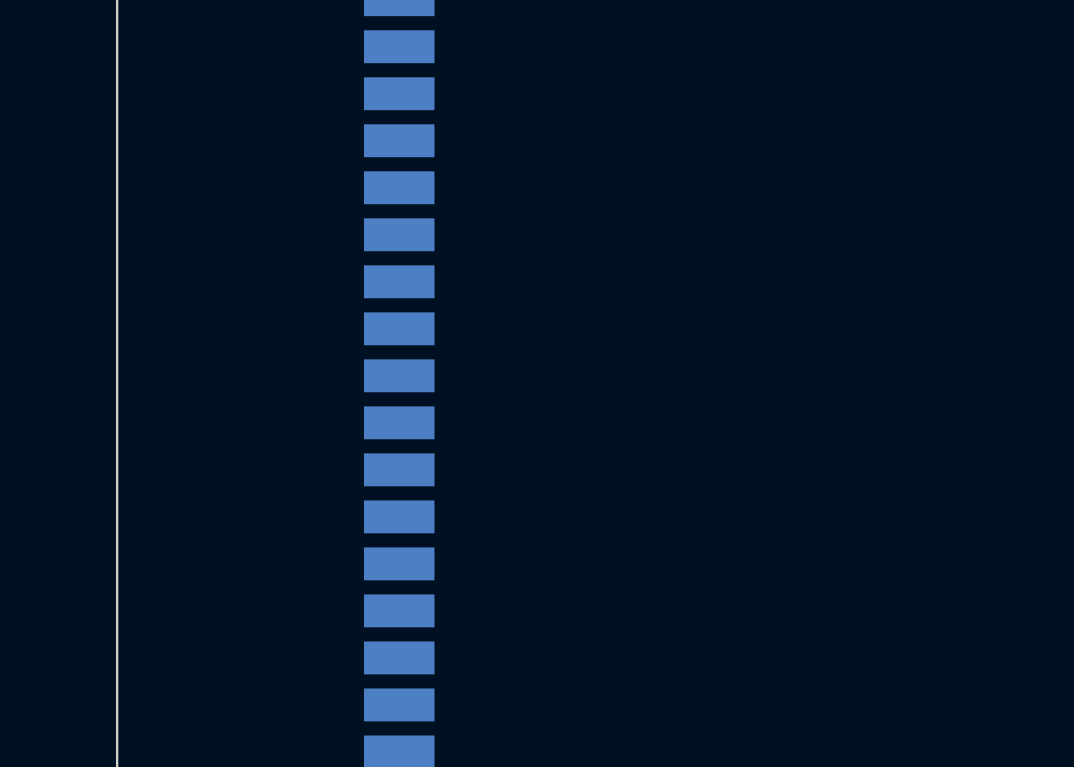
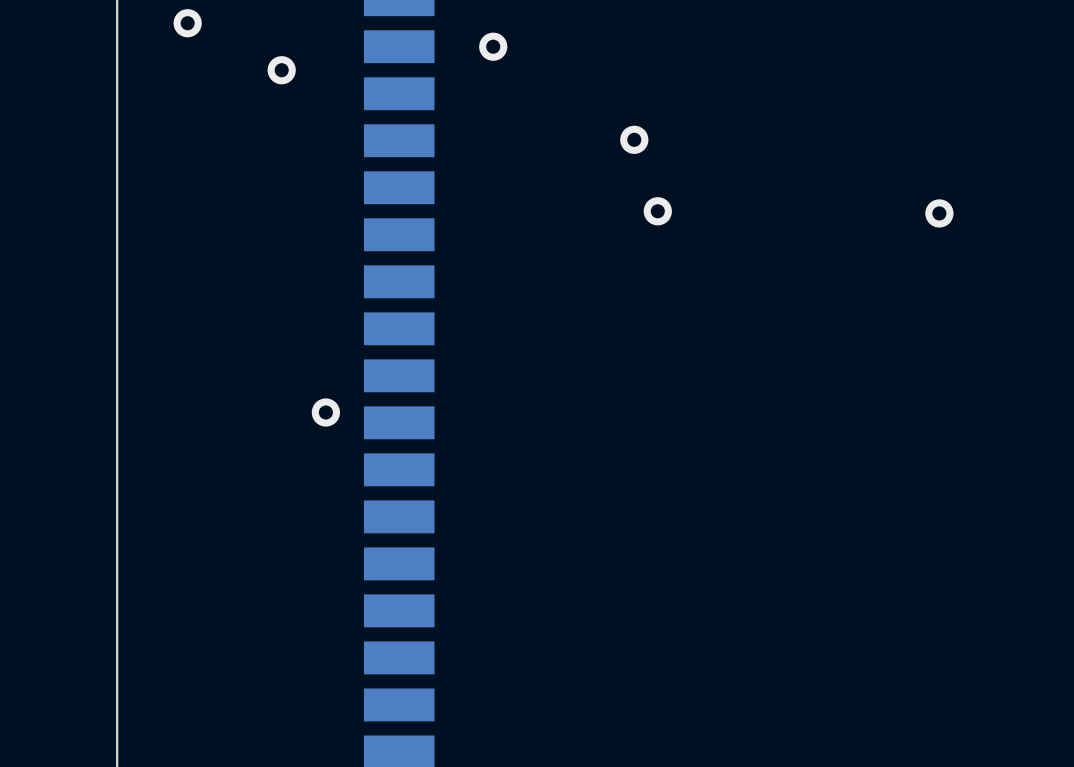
via: none -> (187, 23)
via: none -> (493, 46)
via: none -> (281, 70)
via: none -> (634, 139)
via: none -> (657, 211)
via: none -> (939, 213)
via: none -> (325, 412)

